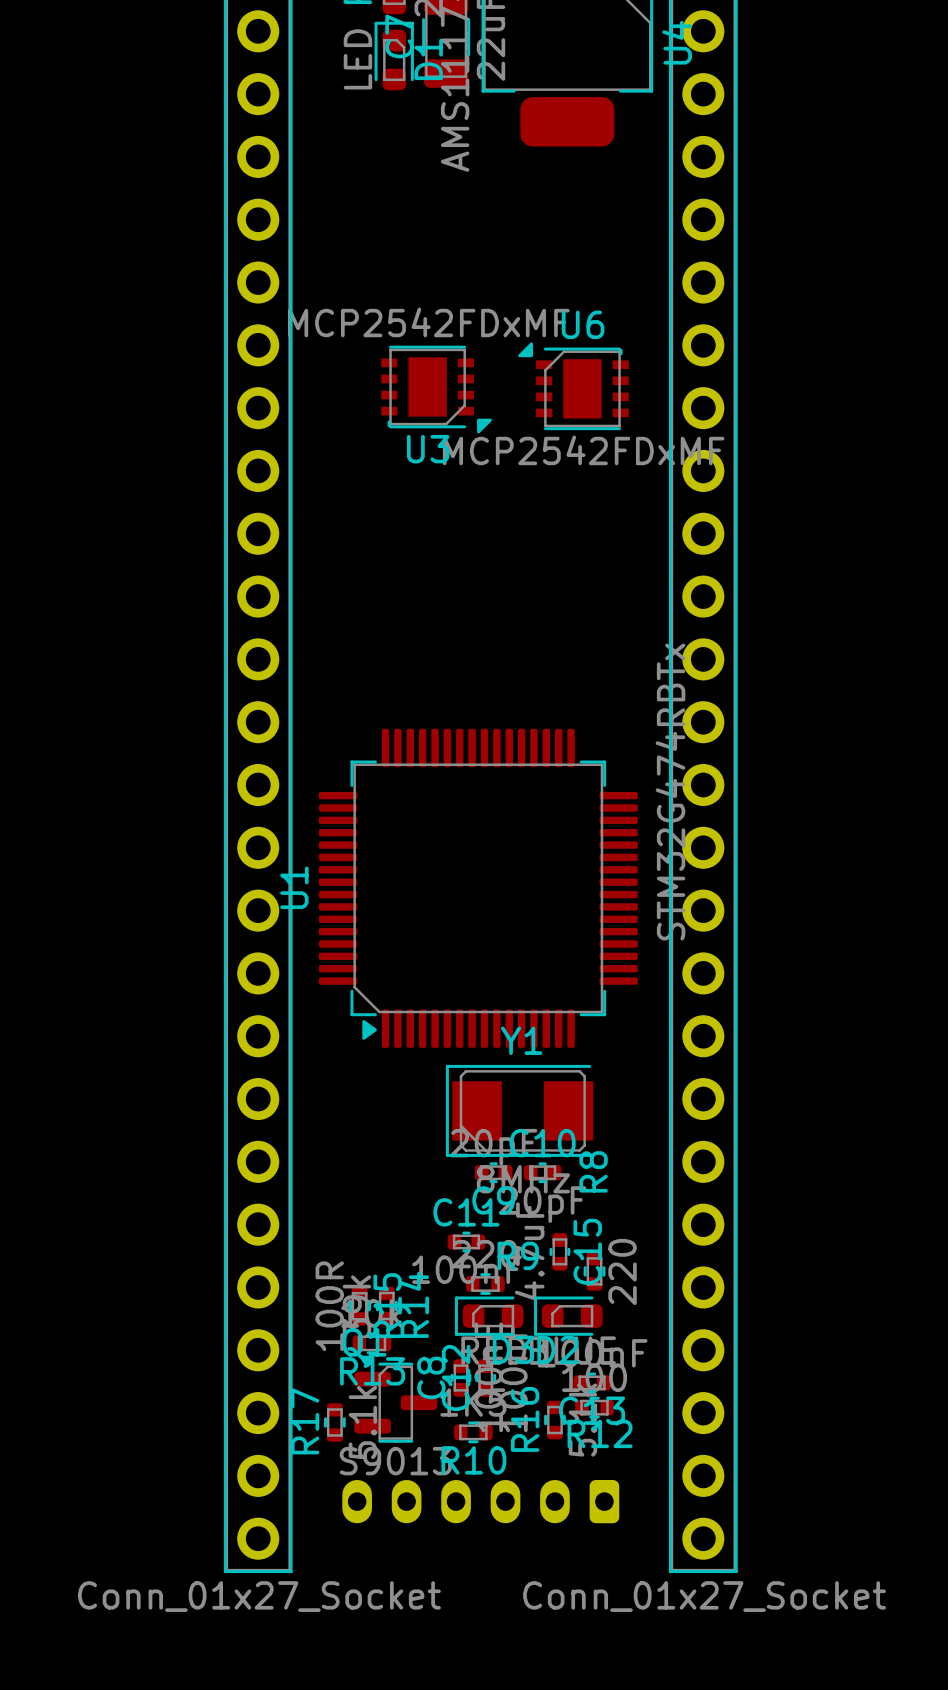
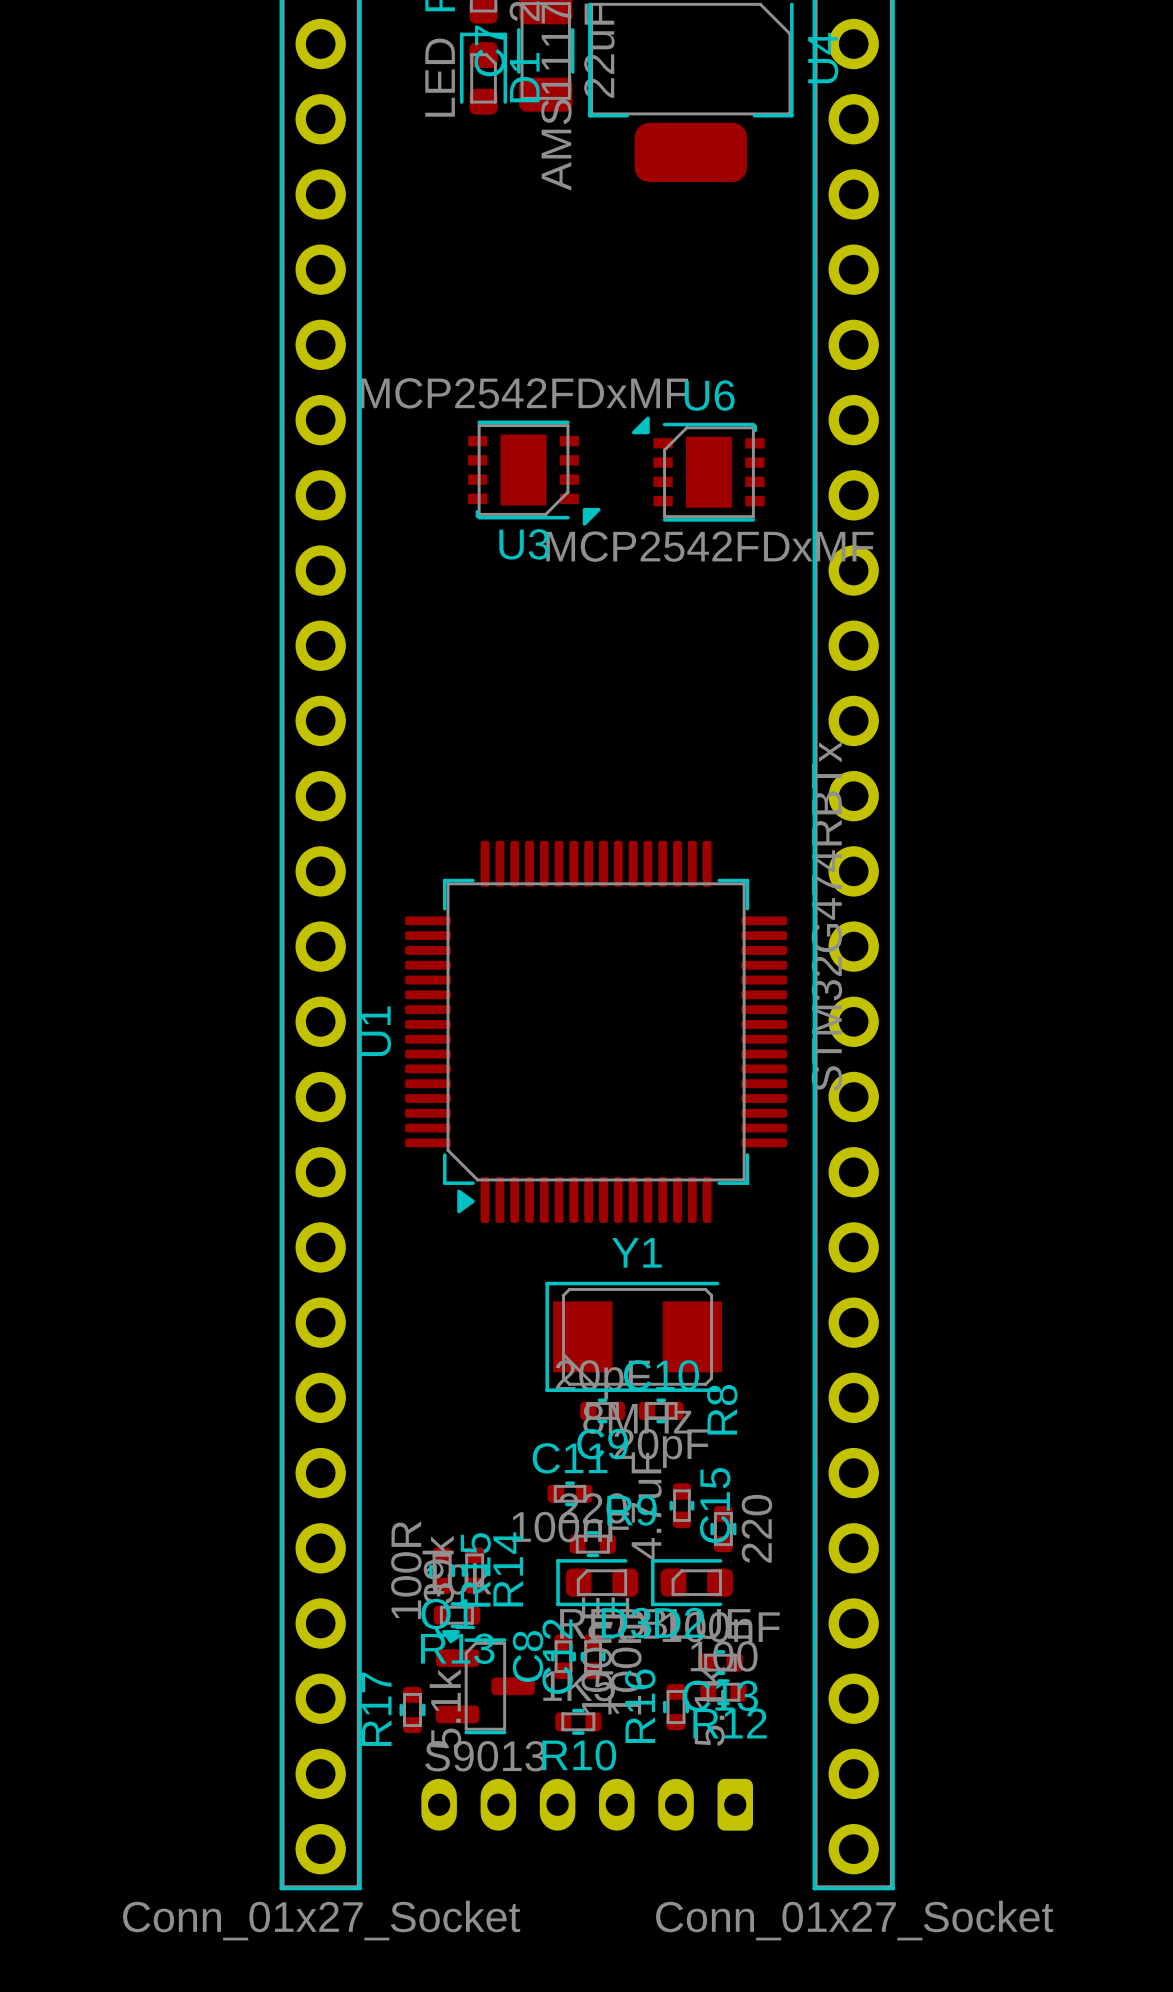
U1 position: (478, 888) -> (596, 1031)

